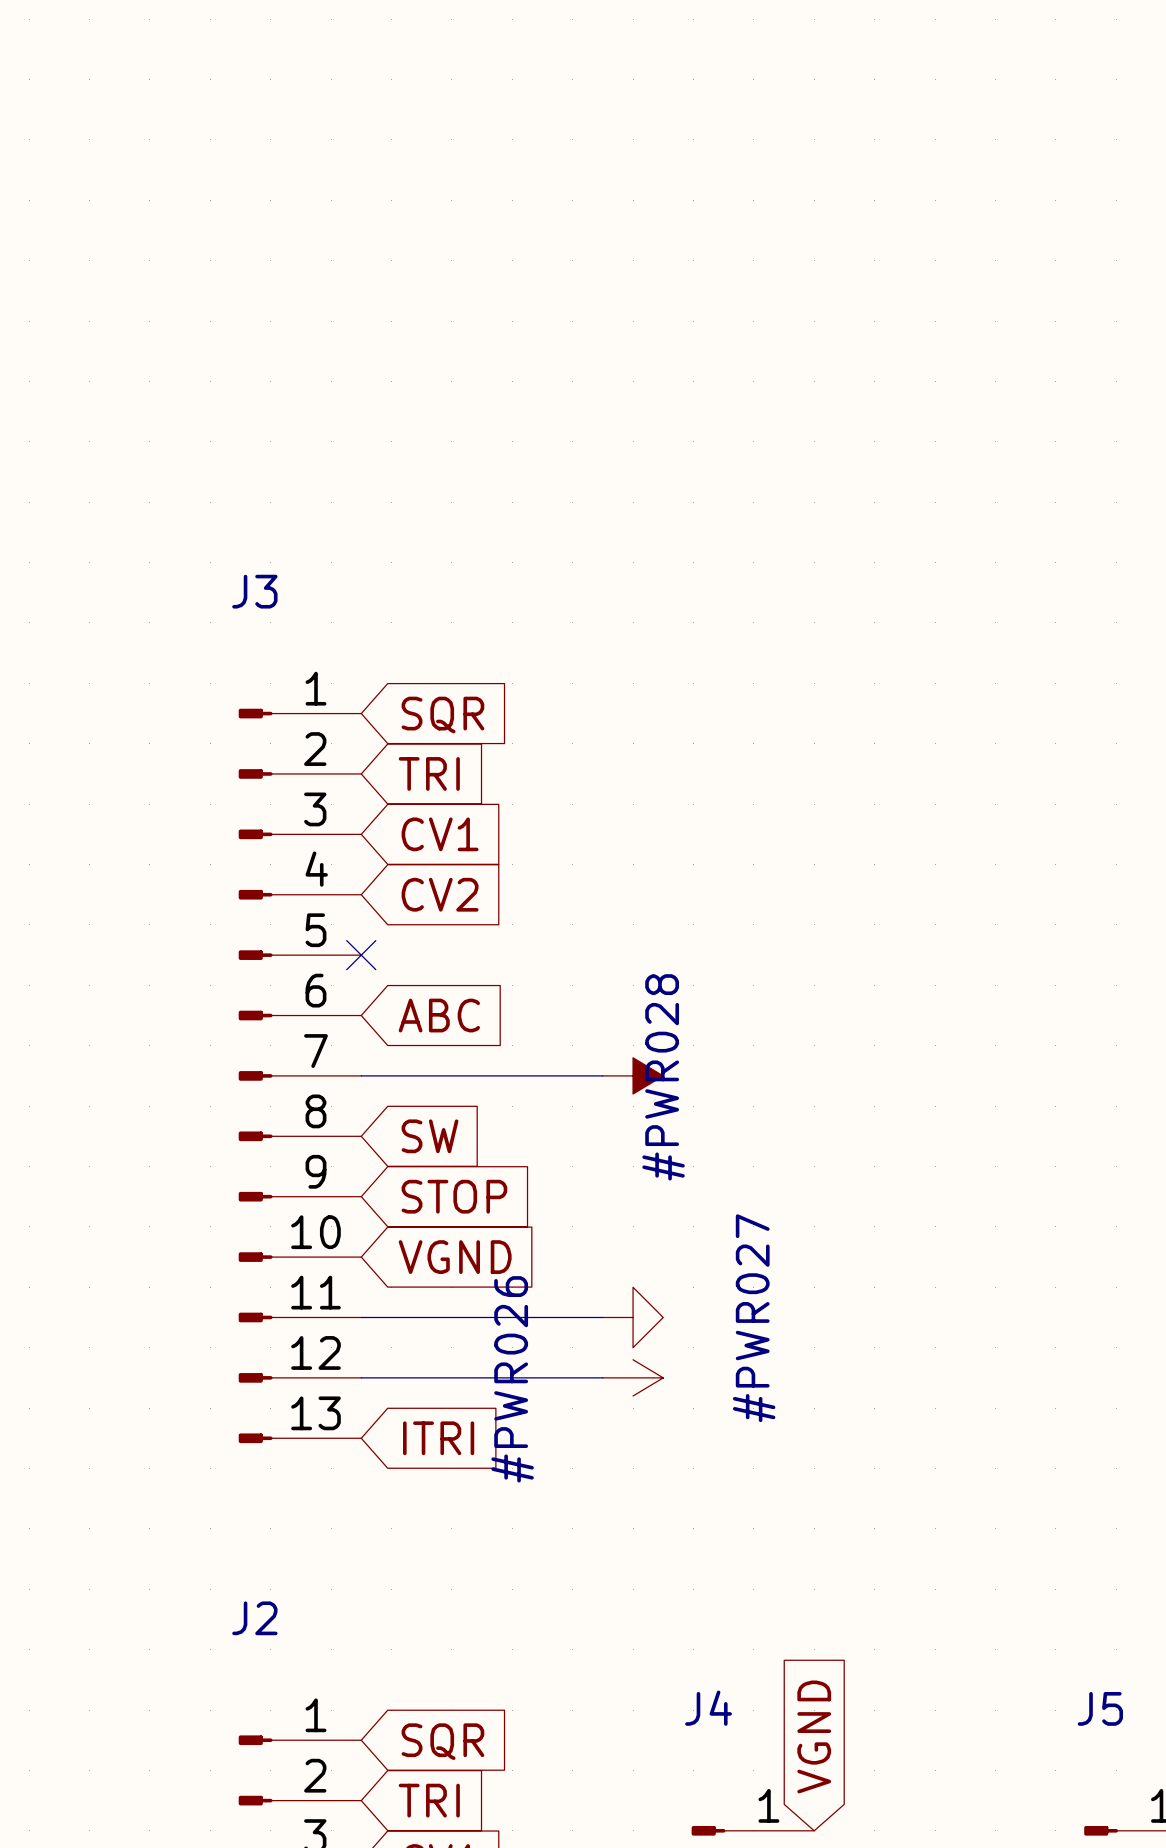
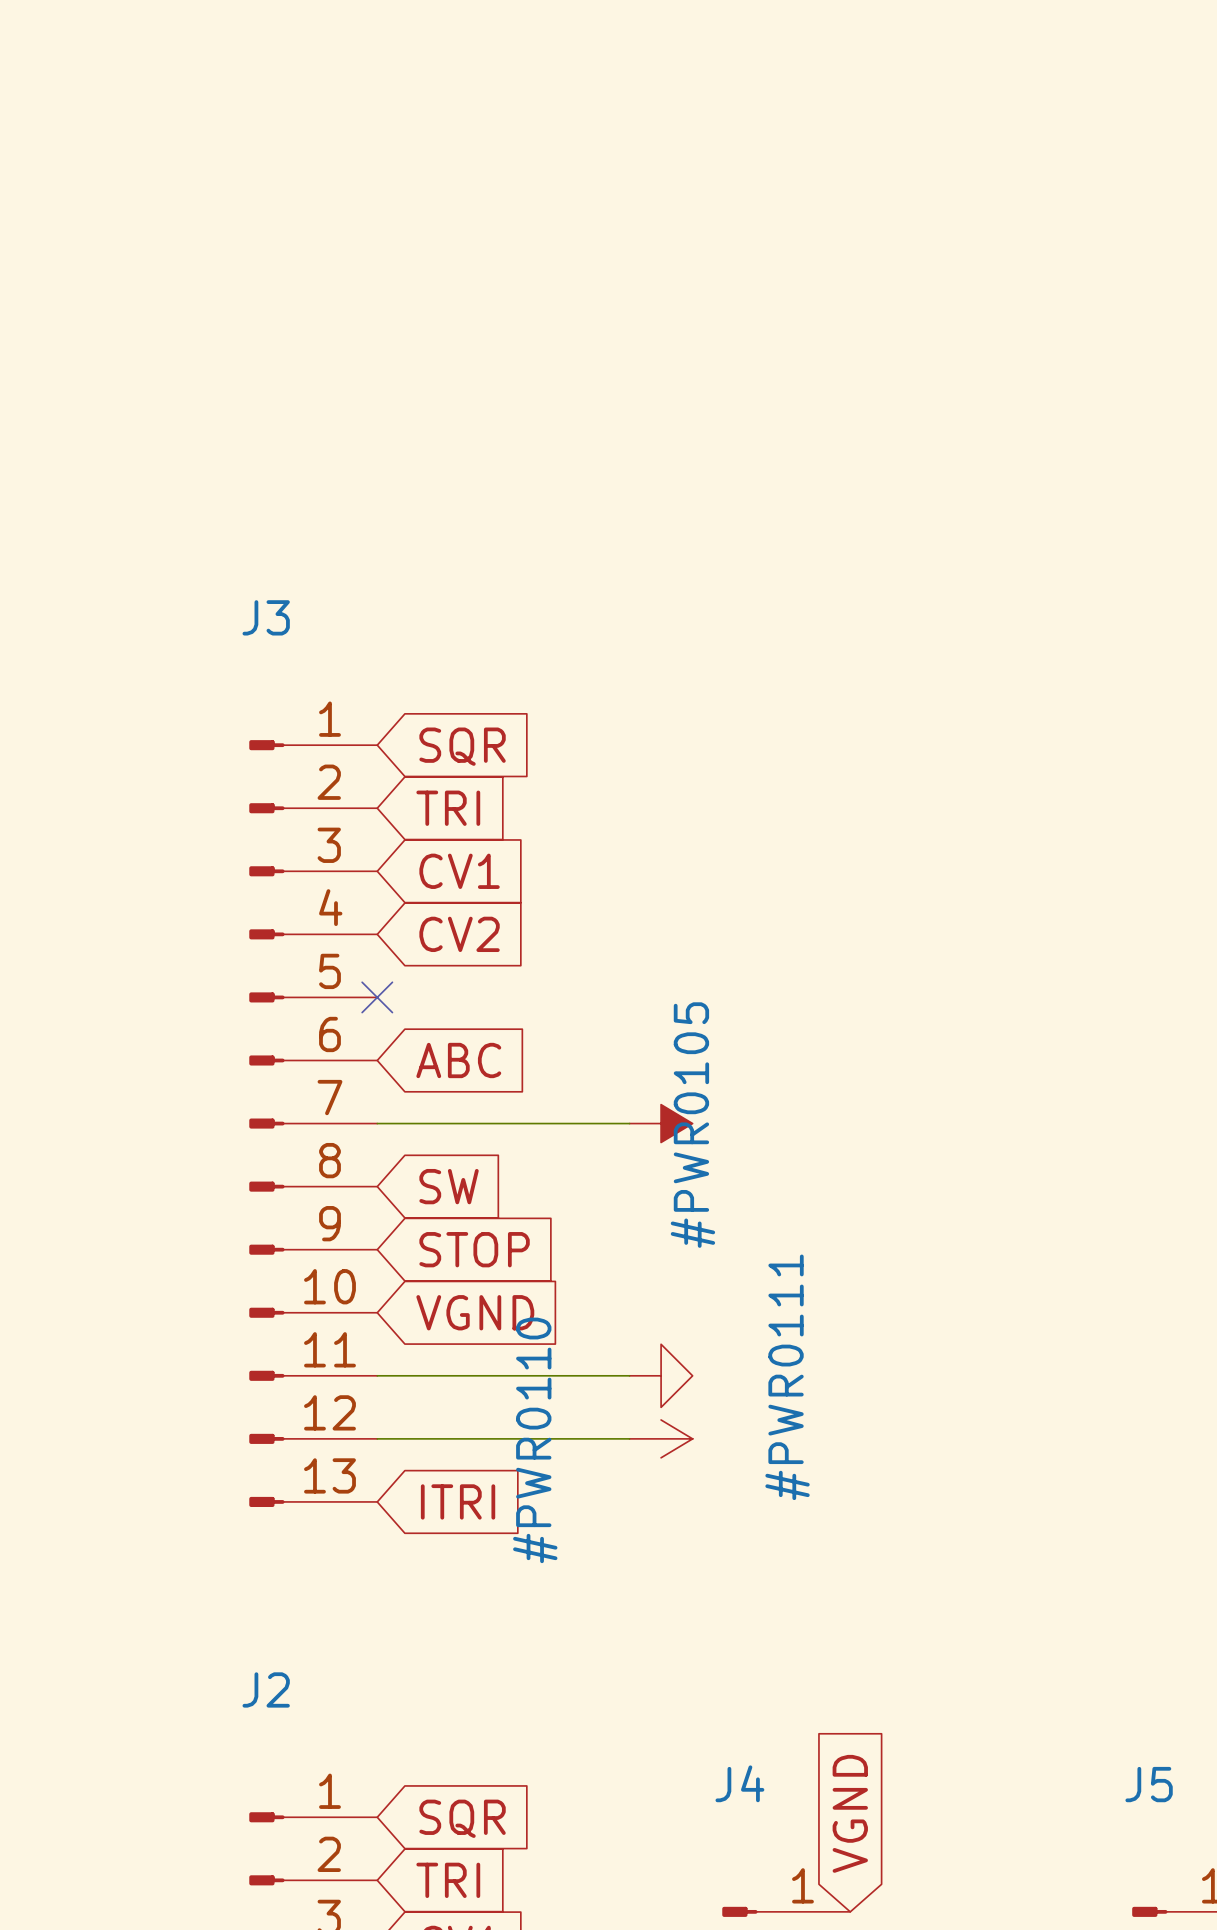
#PWR028 name: #PWR028 (663, 1077) -> #PWR0105 (692, 1125)
#PWR027 name: #PWR027 (754, 1318) -> #PWR0111 (787, 1377)
#PWR026 name: #PWR026 (512, 1379) -> #PWR0110 (535, 1440)

